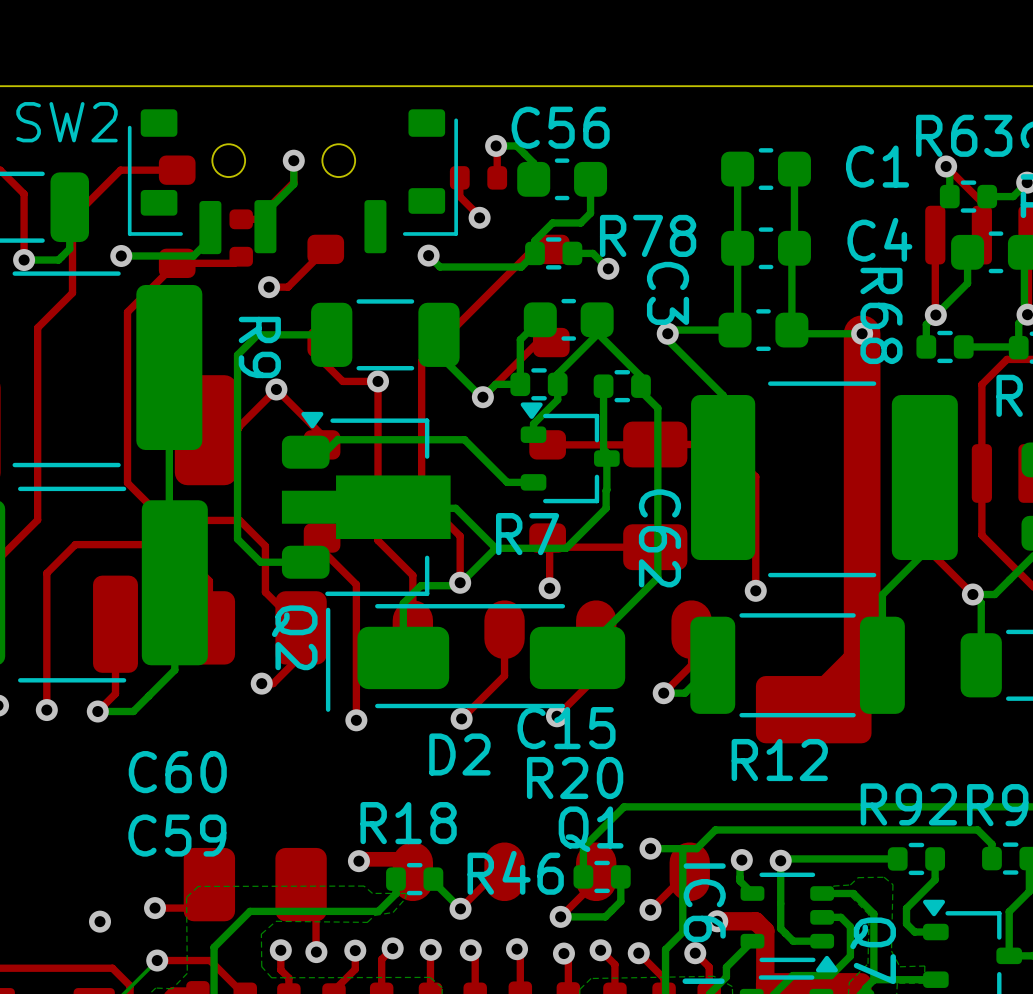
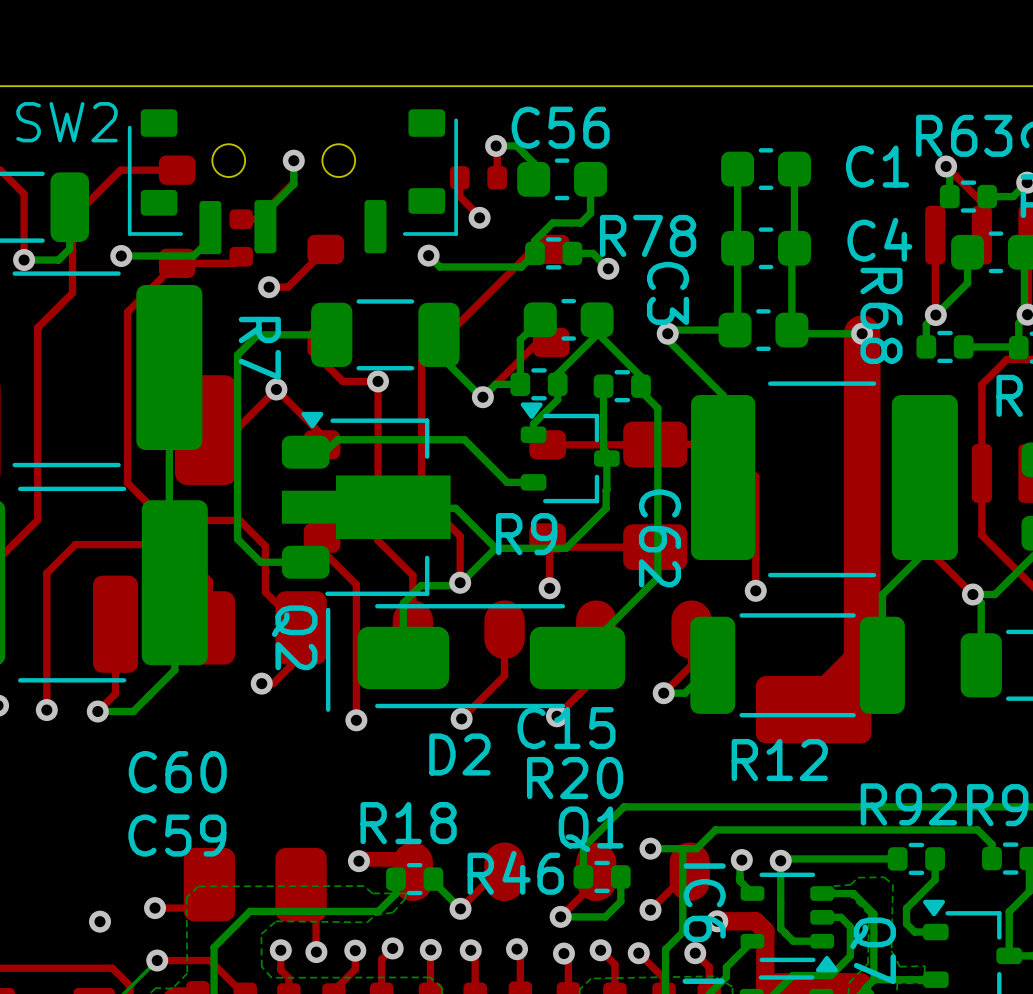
R9 name: R9 (259, 347) -> R7 (259, 348)
R7 name: R7 (527, 534) -> R9 (526, 534)

